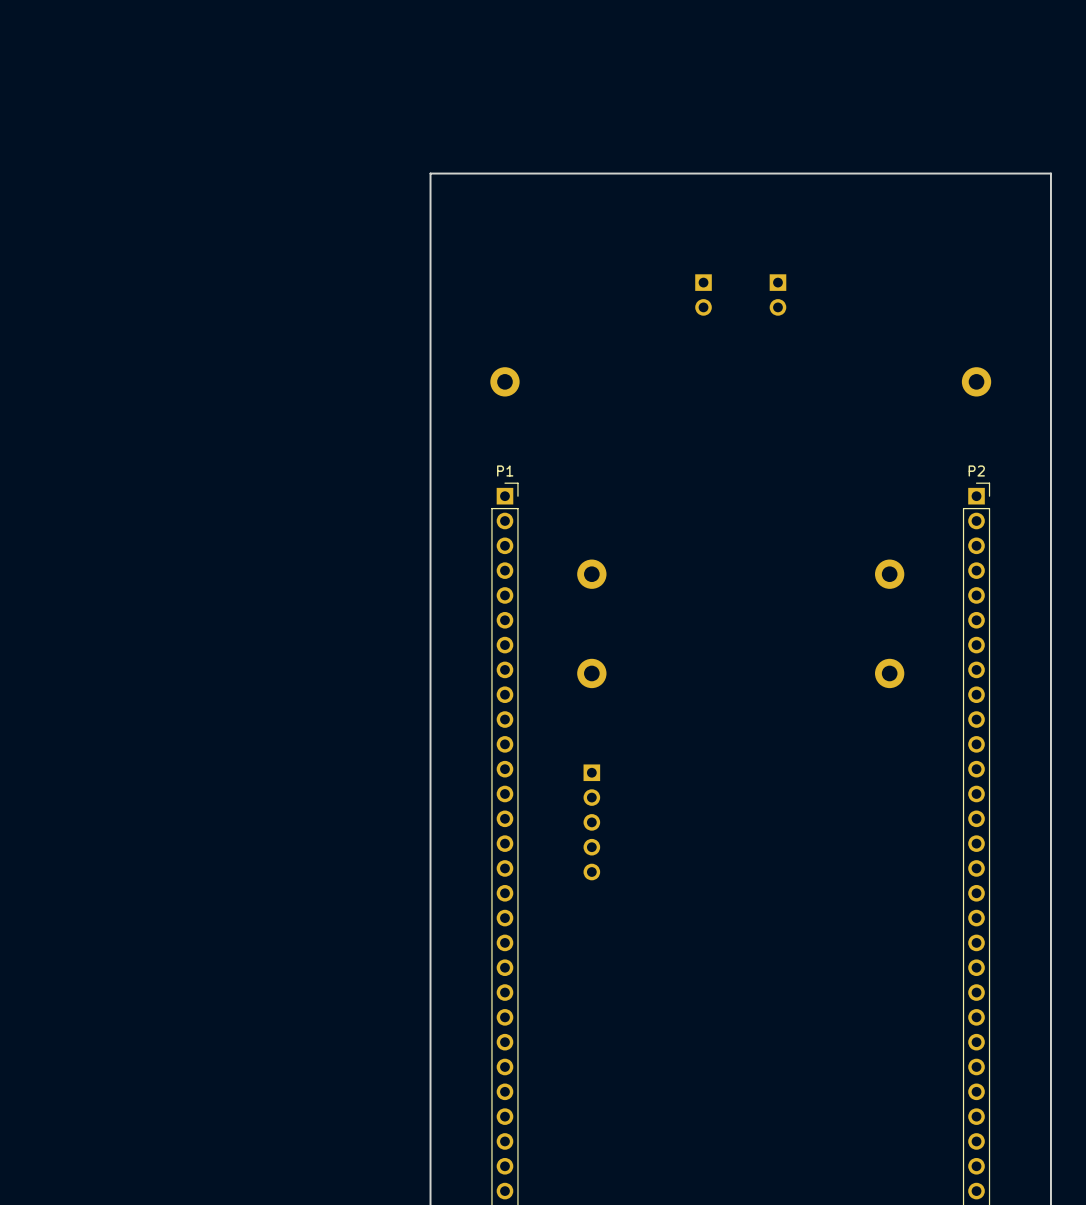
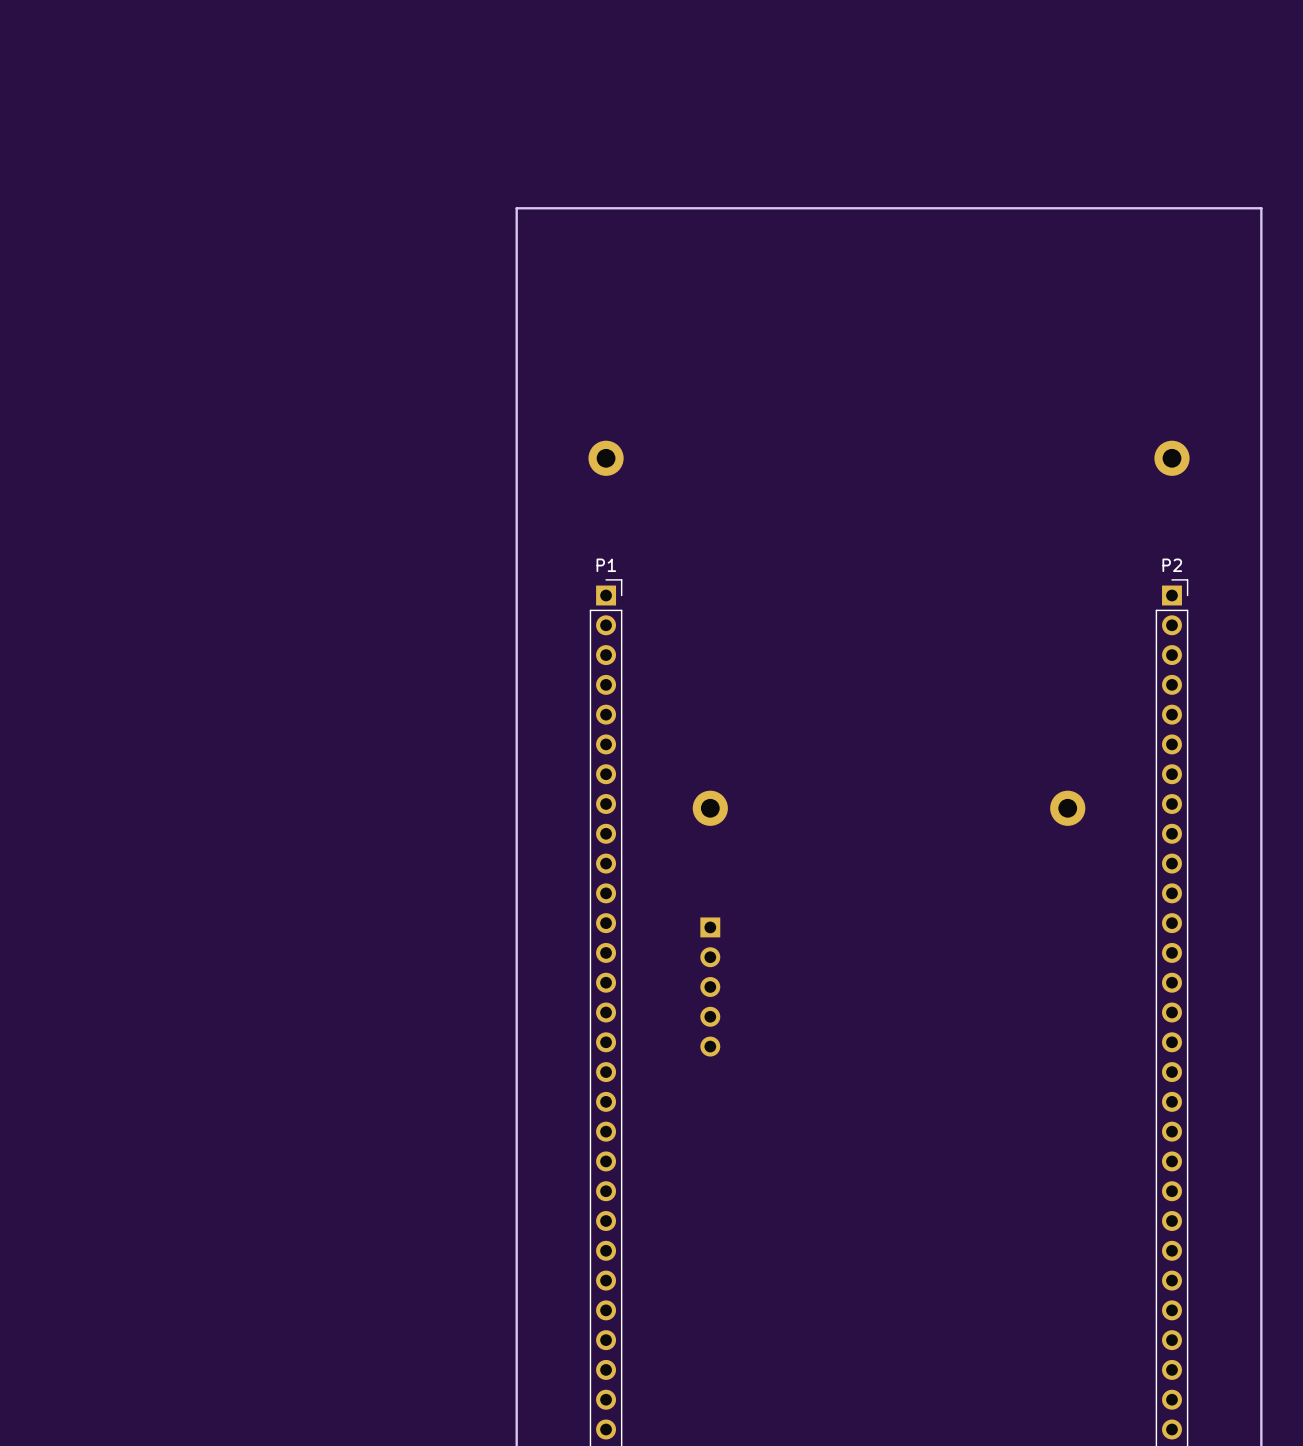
part: (703, 294) -> none
part: (777, 294) -> none
part: (591, 574) -> none
part: (889, 574) -> none

